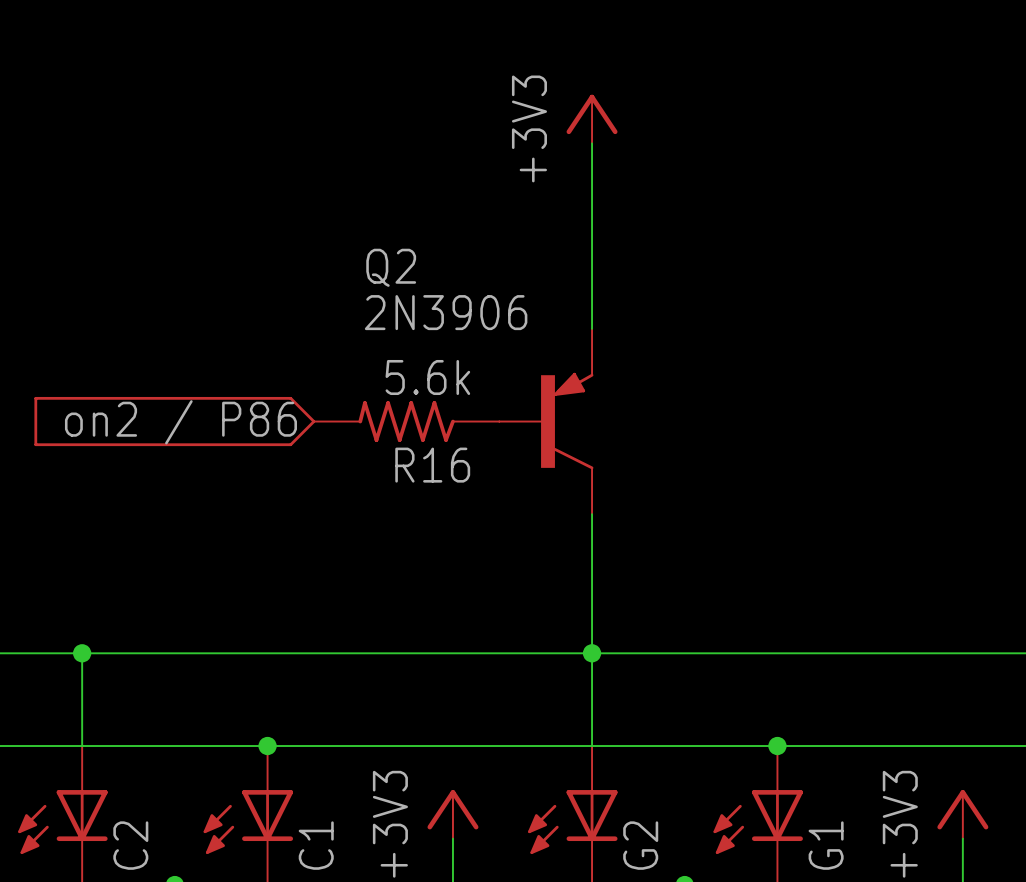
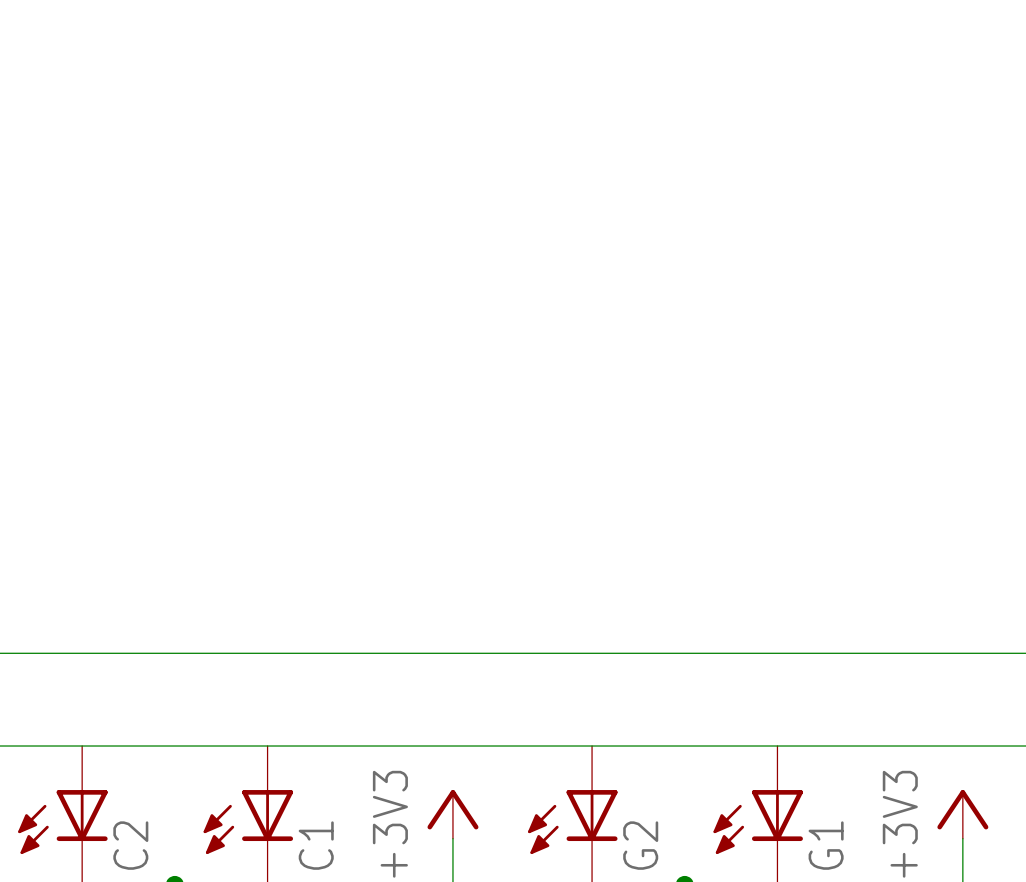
power symbol: +3V3 (592, 119) -> none
wire: (592, 143) (592, 328) -> none
part: on2 / P86 (174, 421) -> none
R16: 5.6k (406, 421) -> none
Q2: 2N3906 (546, 421) -> none
wire: (592, 514) (592, 746) -> none
wire: (82, 653) (82, 746) -> none
junction: (82, 653) -> none
junction: (592, 653) -> none
junction: (267, 746) -> none
junction: (777, 746) -> none

